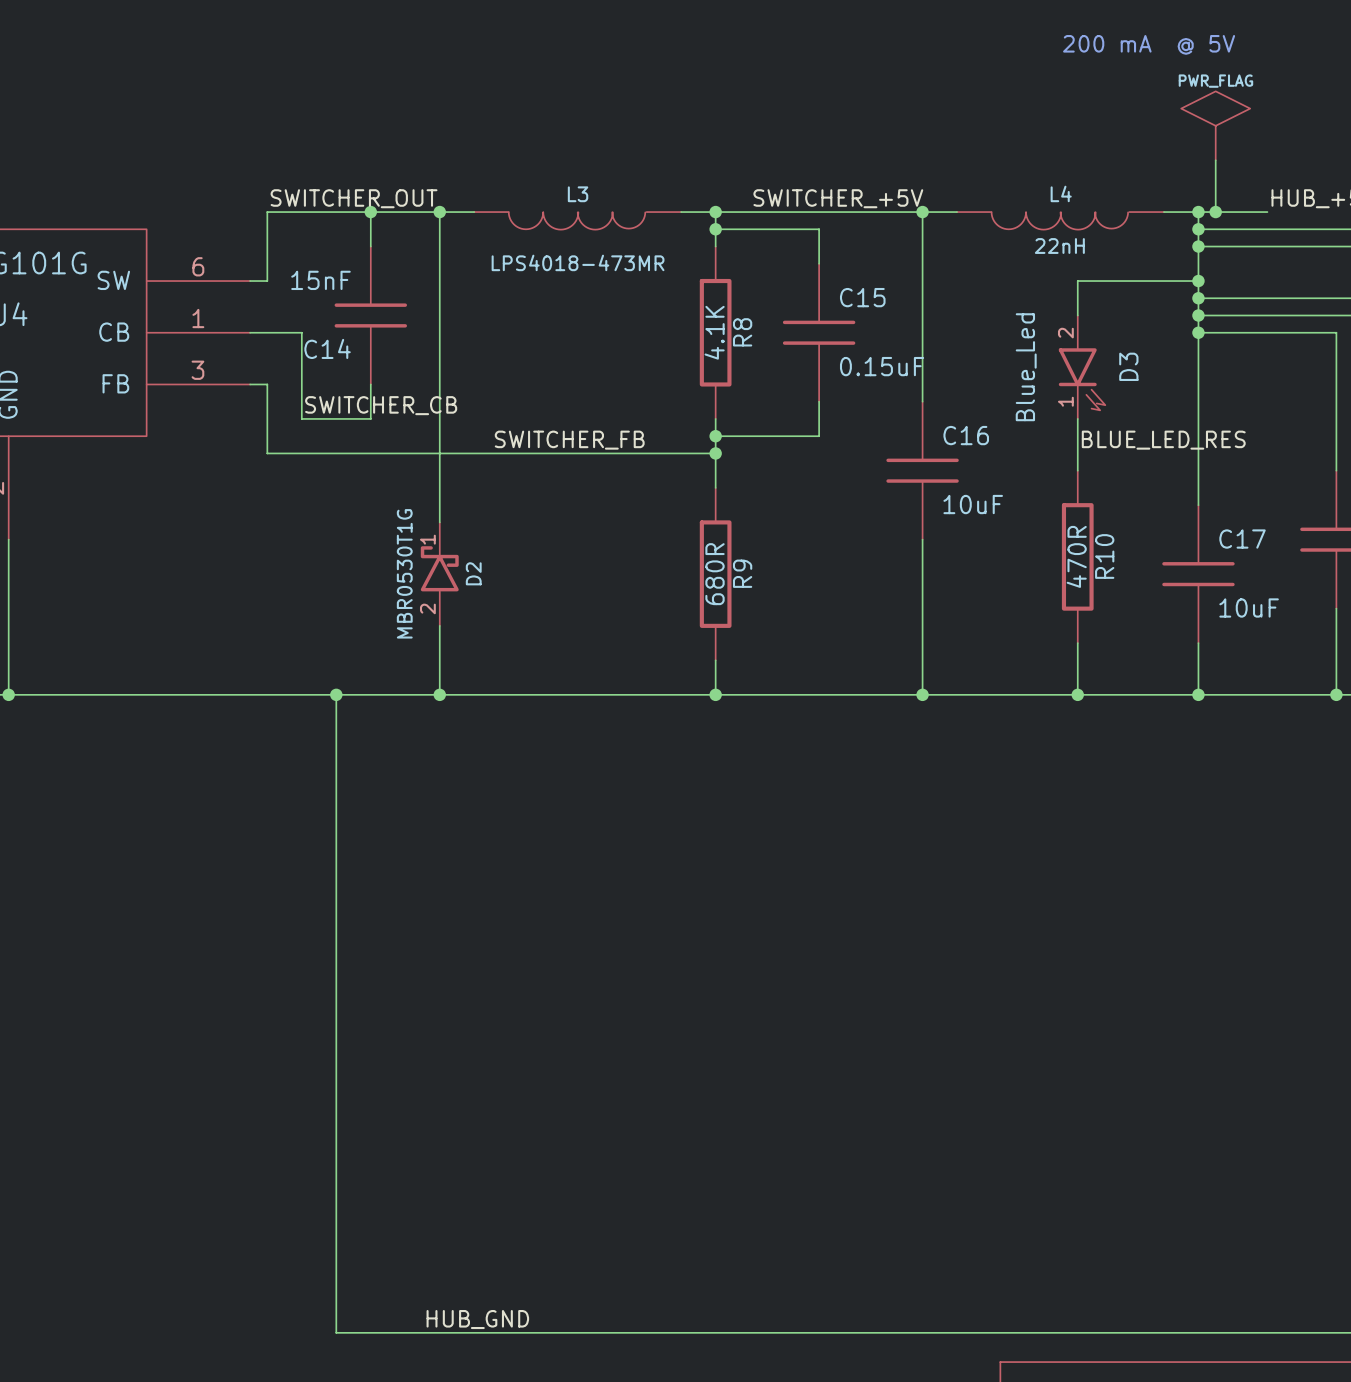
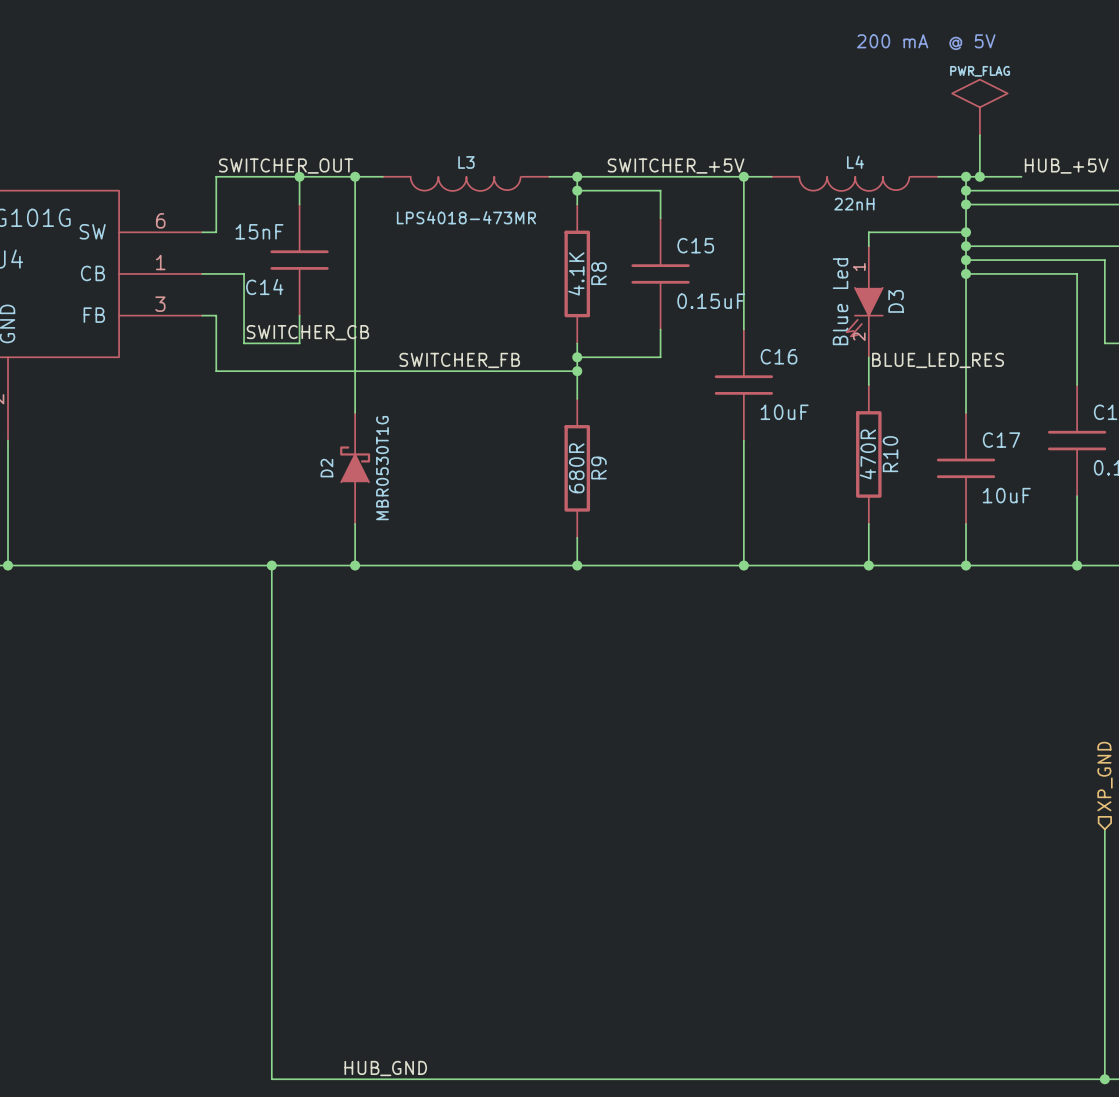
D3 symbol: [1058, 315, 1106, 419] -> [846, 246, 883, 358]
D3 value: Blue_Led (1026, 367) -> Blue Led (840, 301)
D2 symbol: [420, 522, 459, 626] -> [340, 412, 371, 524]
D2 value position: MBR0530T1G (404, 573) -> MBR0530T1G (382, 468)
D2 name position: D2 (473, 573) -> D2 (326, 468)

